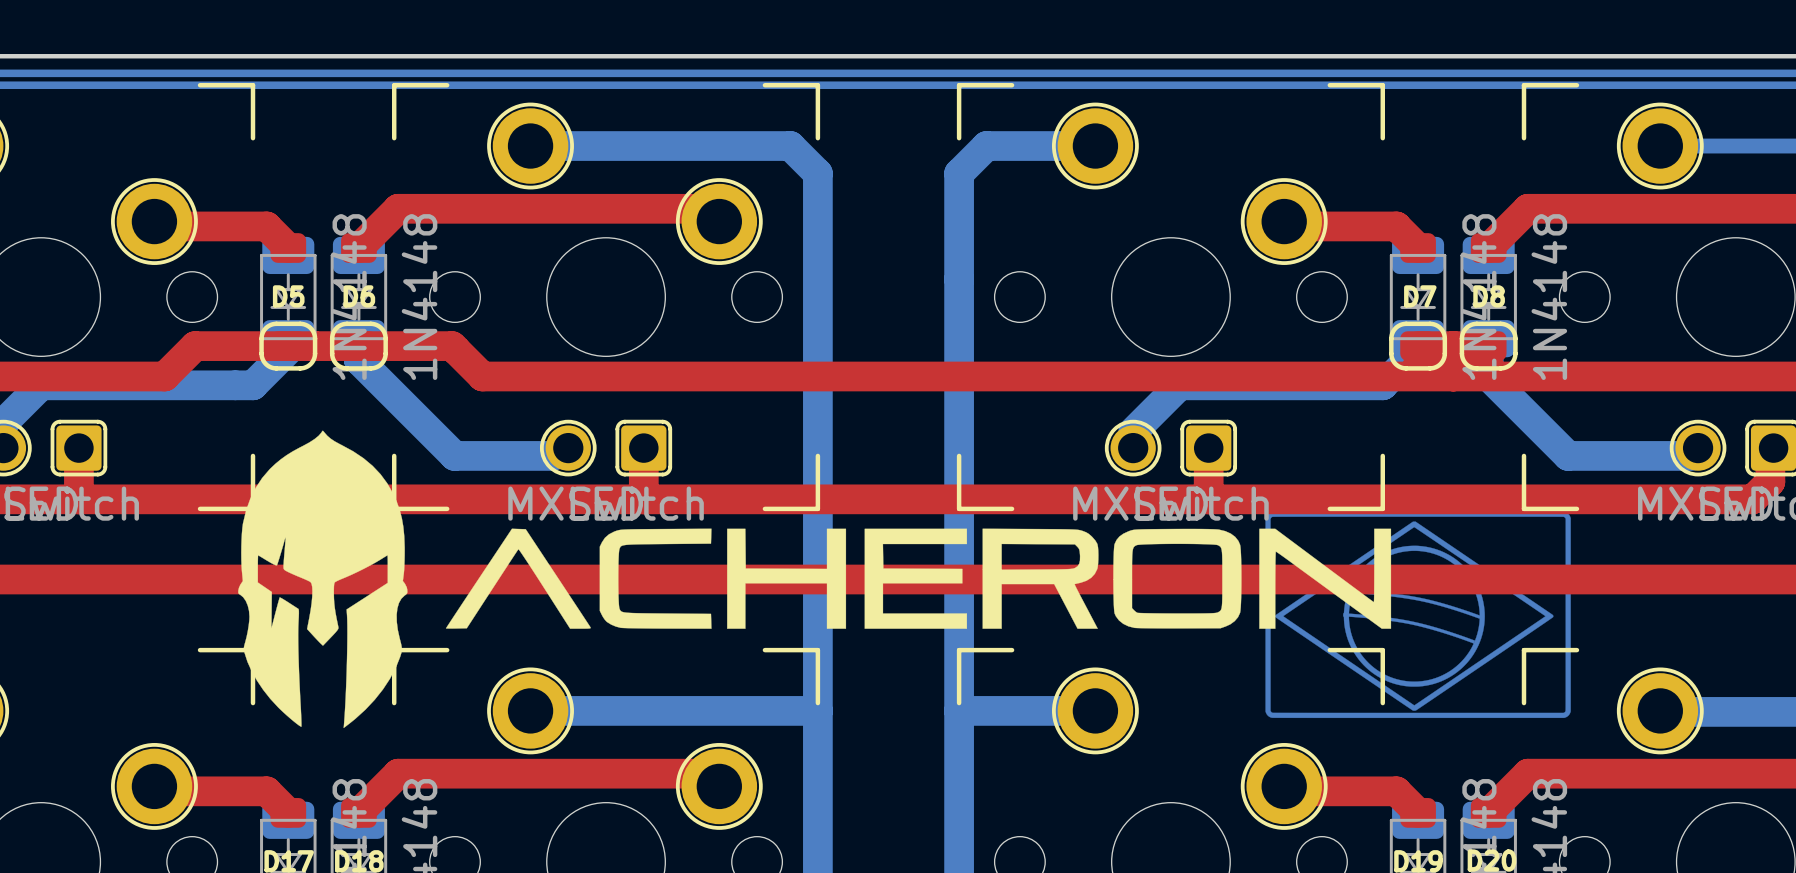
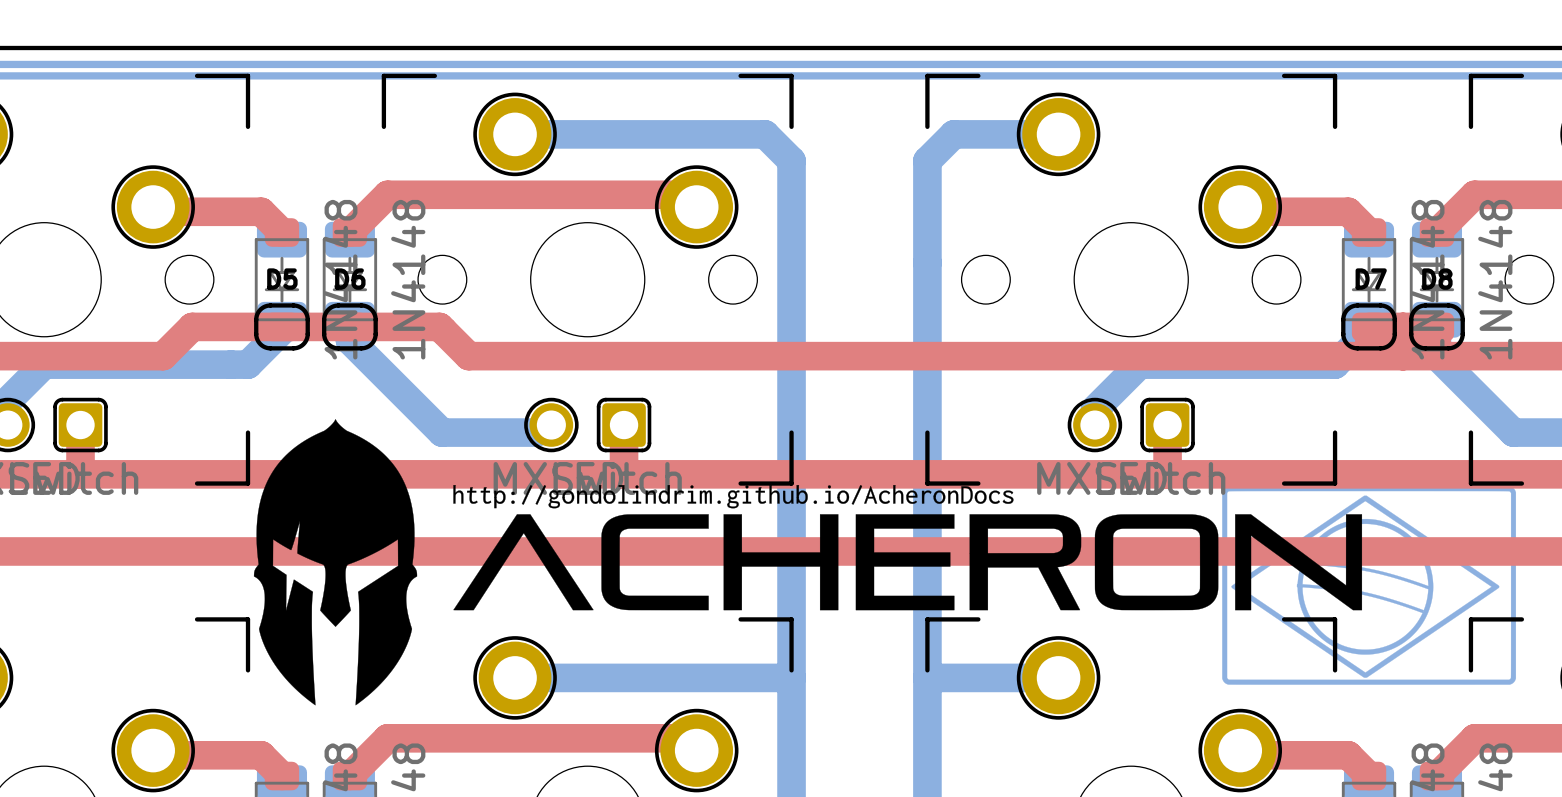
drawing shape: [238, 430, 1392, 729] -> [253, 419, 1363, 706]
line: (394, 455) (394, 508) (447, 508) -> none
line: (447, 650) (394, 650) (394, 703) -> none

